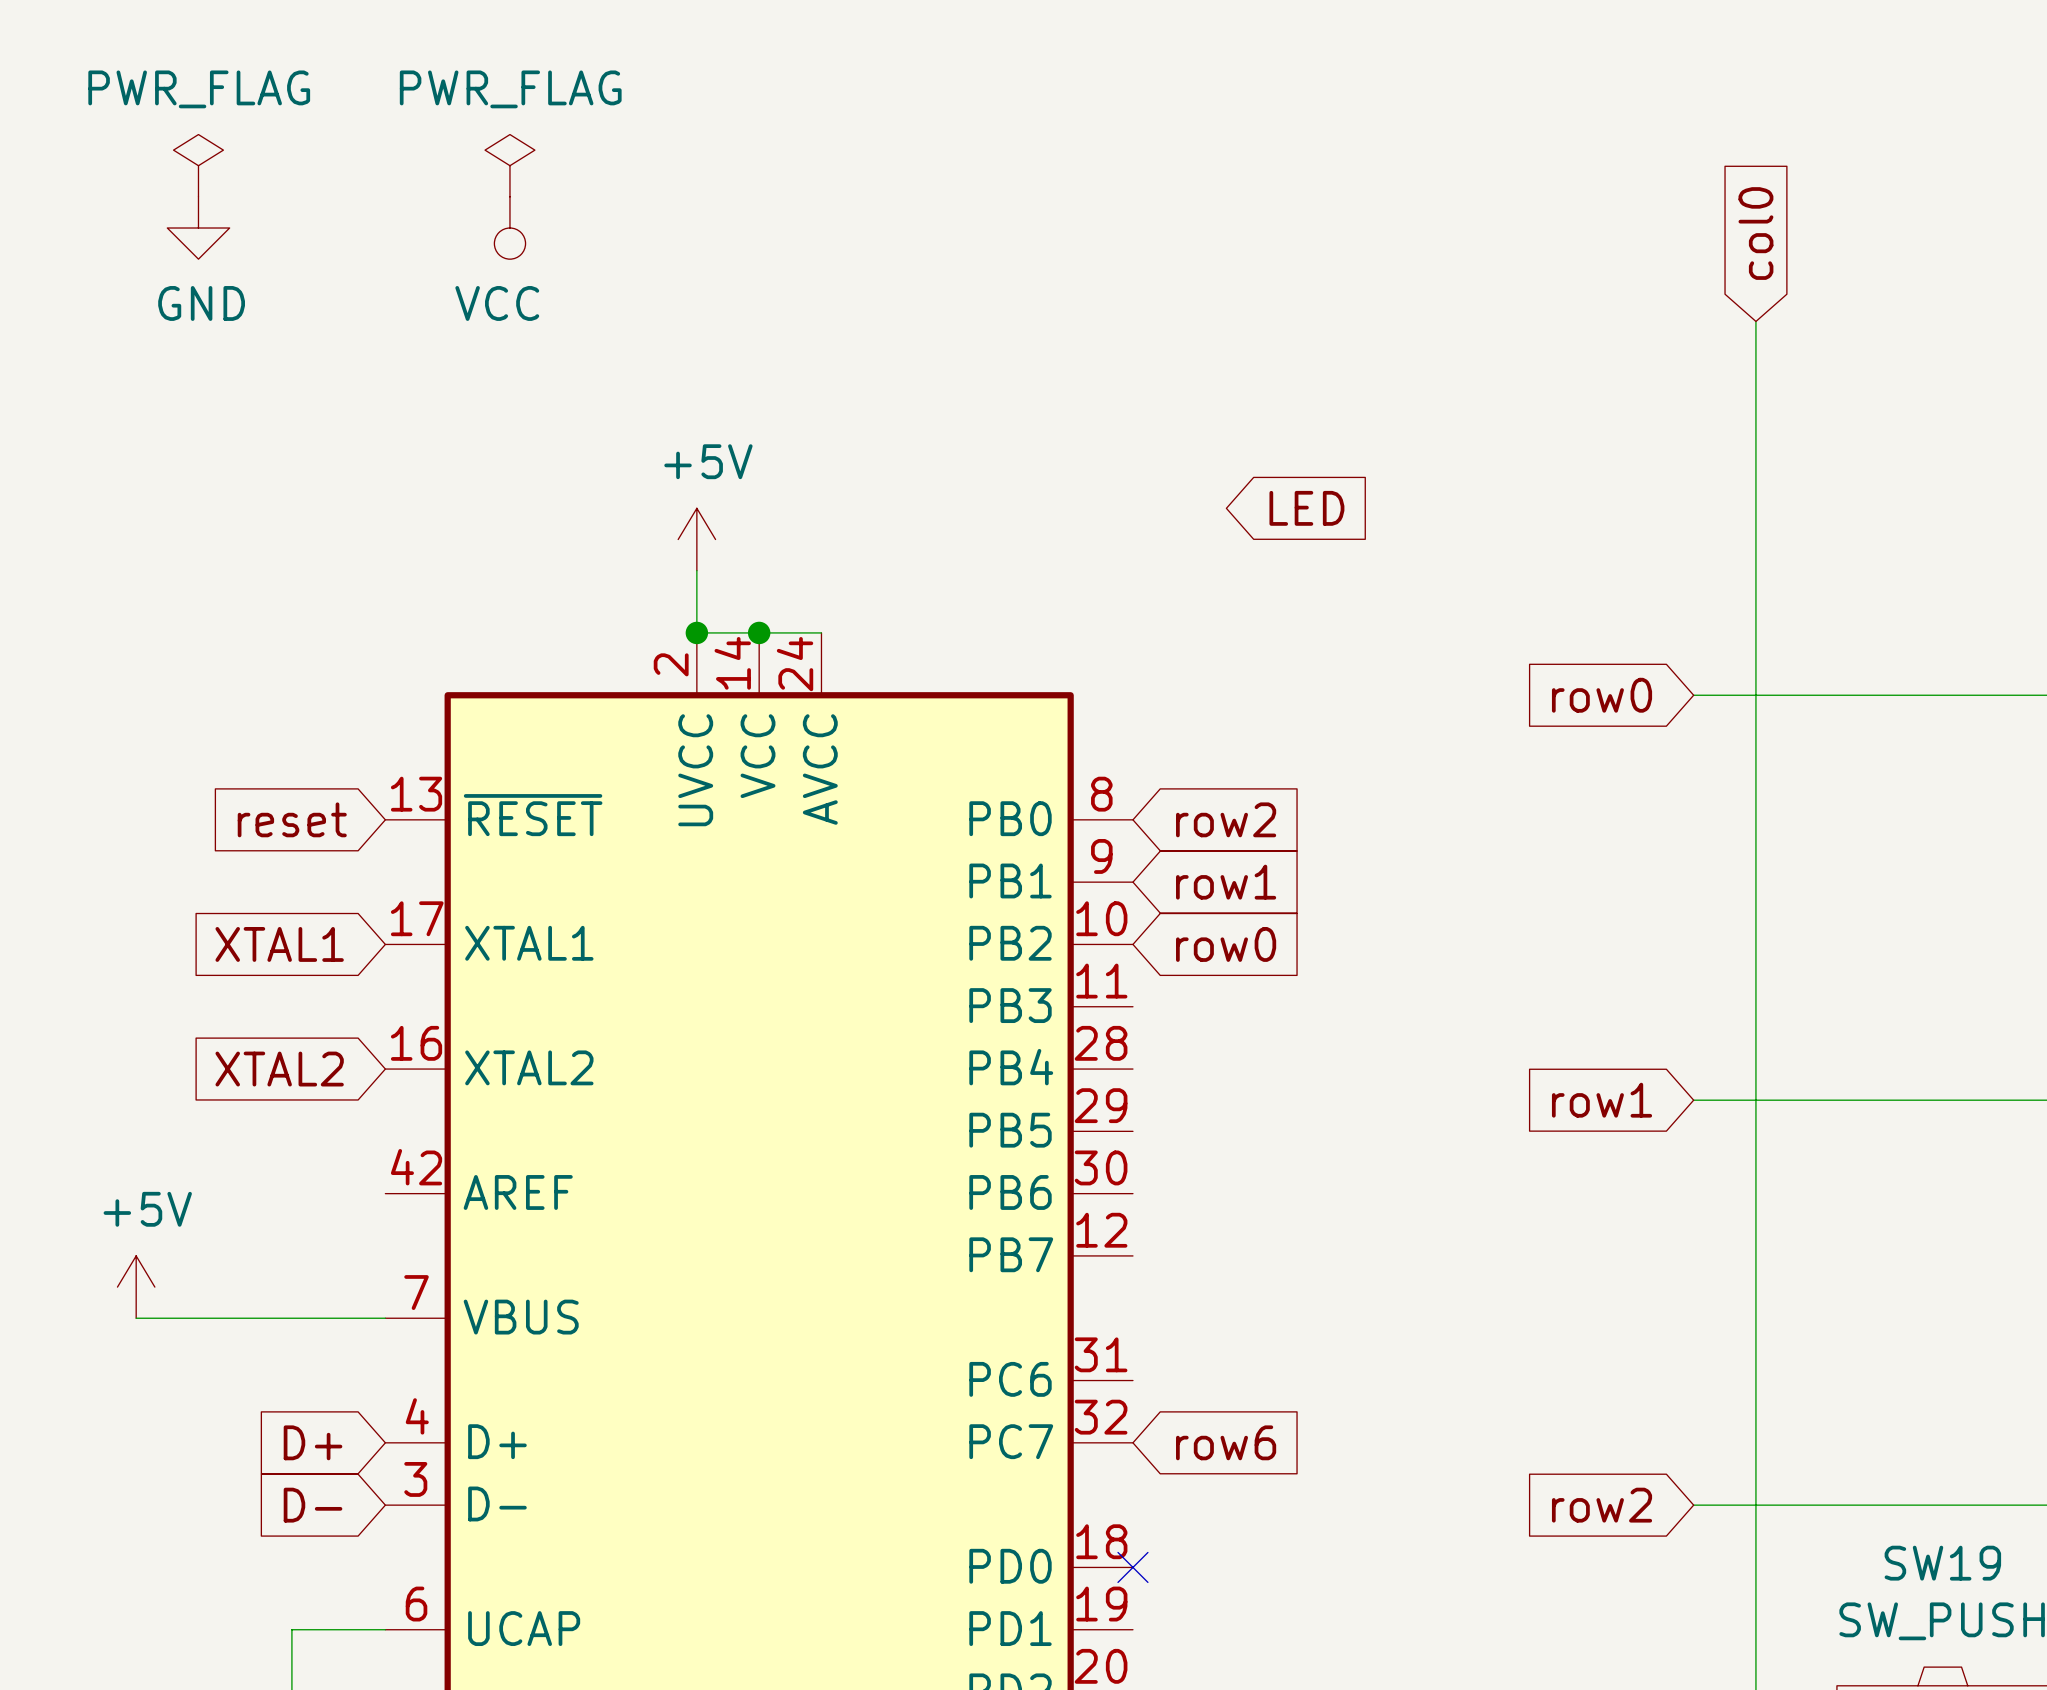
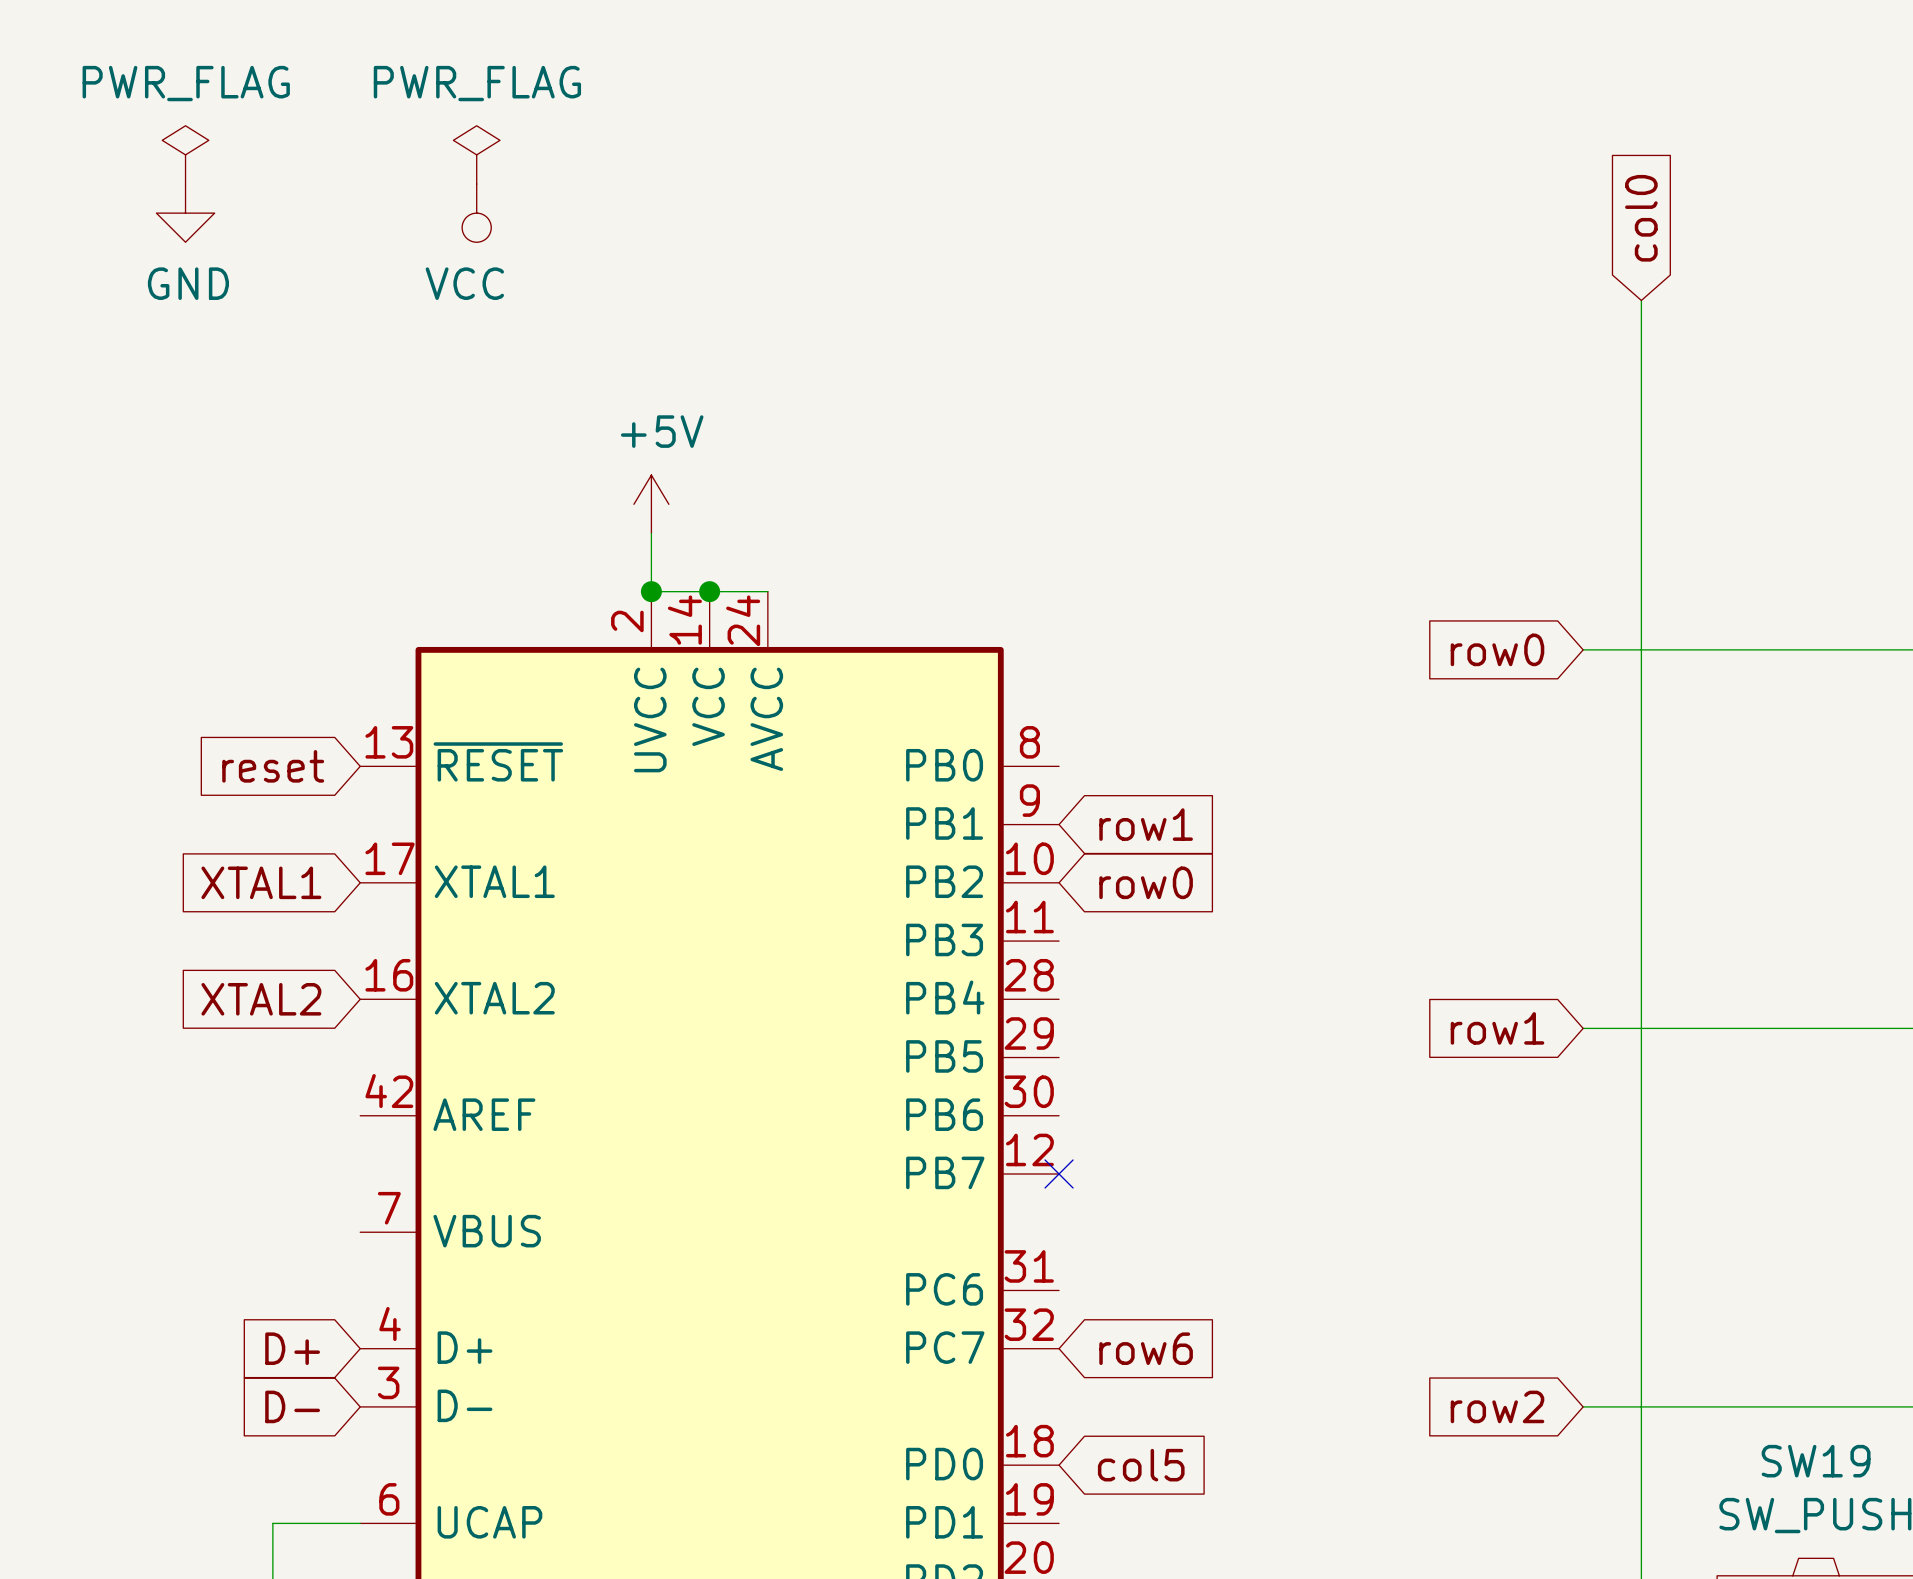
global label: LED (1306, 508) -> none
global label: row2 (1226, 819) -> none
no-connect mark: none -> (1059, 1173)
power symbol: +5V (136, 1287) -> none
wire: (136, 1318) (385, 1318) -> none
no-connect mark: (1132, 1567) -> none
global label: none -> col5 (1141, 1465)

